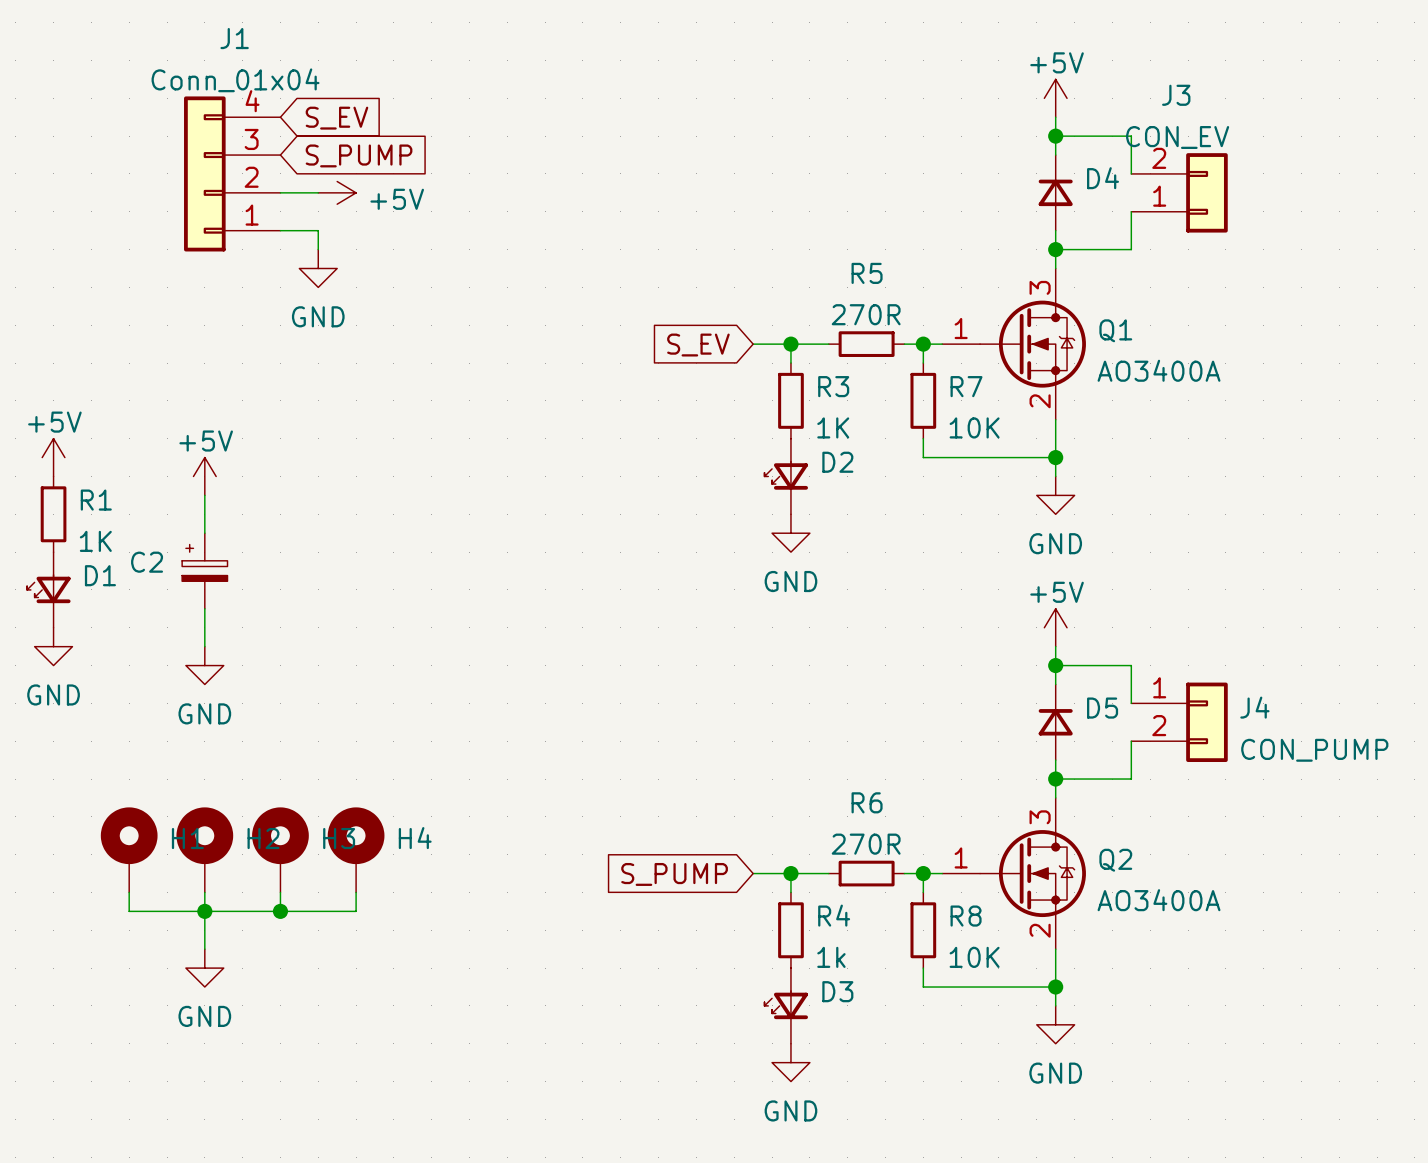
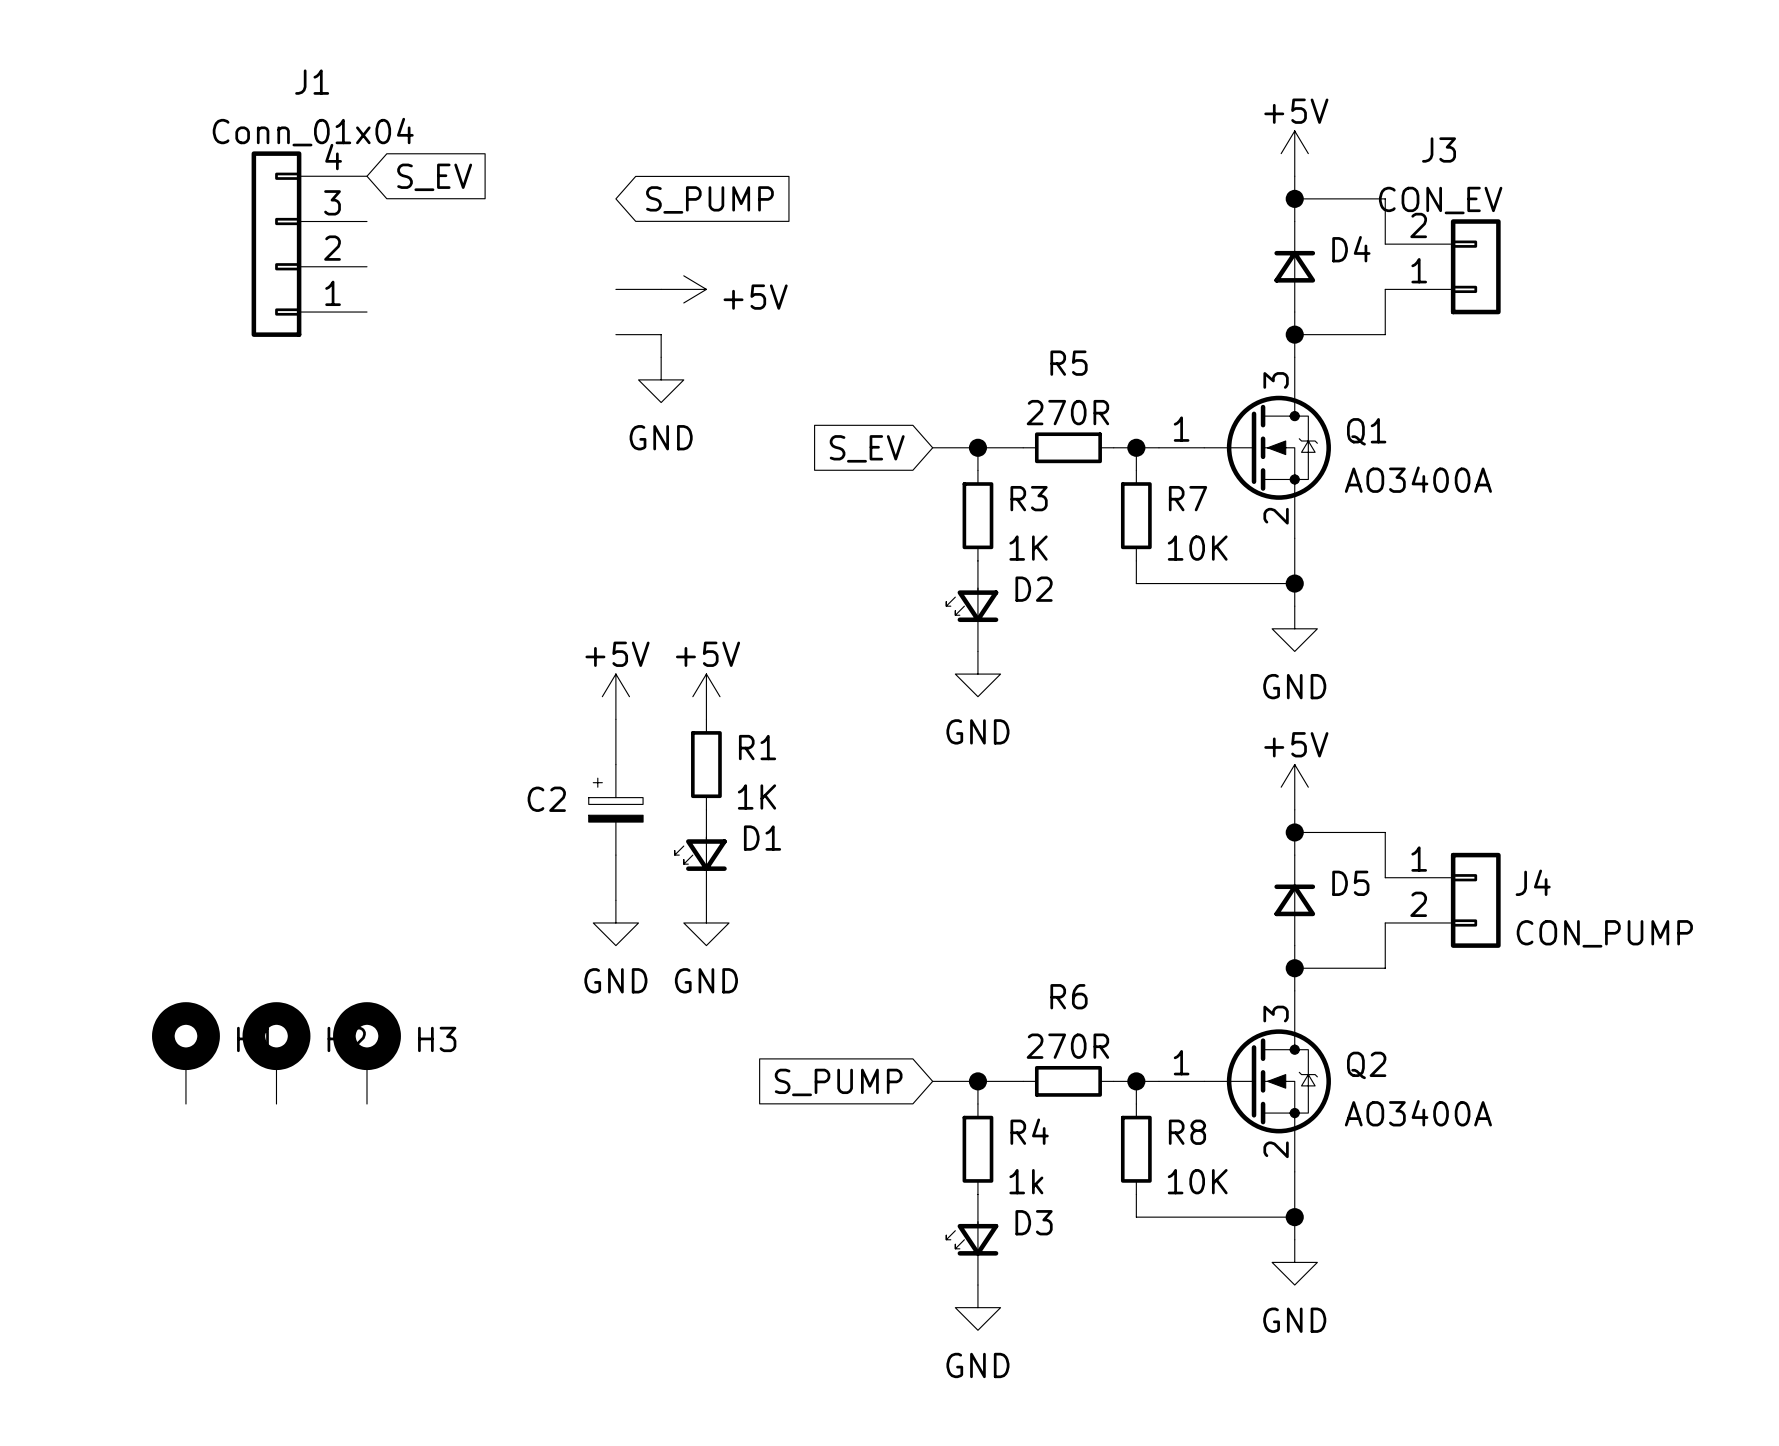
global label position: S_PUMP (359, 155) -> S_PUMP (709, 199)
wire: (280, 192) (318, 192) -> (615, 289) (661, 289)
power symbol: +5V (337, 192) -> none
power symbol: none -> +5V (683, 289)
wire: (280, 230) (318, 230) (318, 249) -> (615, 334) (661, 334) (661, 357)
power symbol position: GND (318, 268) -> GND (661, 379)
power symbol: +5V (53, 457) -> none
power symbol: +5V (204, 476) -> none
wire: (204, 495) (204, 533) -> (615, 719) (615, 764)
R1 position: (53, 514) -> (706, 764)
power symbol: none -> +5V (615, 696)
power symbol: none -> +5V (706, 696)
C2 position: (204, 571) -> (615, 809)
D1 position: (48, 589) -> (700, 855)
wire: (204, 608) (204, 646) -> (615, 855) (615, 900)
power symbol: GND (53, 646) -> none
power symbol: GND (204, 665) -> none
power symbol: none -> GND (615, 922)
power symbol: none -> GND (706, 922)
H4: (356, 849) -> none
wire: (129, 892) (129, 911) (356, 911) (356, 892) -> none
wire: (204, 892) (204, 949) -> none
wire: (280, 892) (280, 911) -> none
junction: (204, 911) -> none
junction: (280, 911) -> none
power symbol: GND (204, 968) -> none

